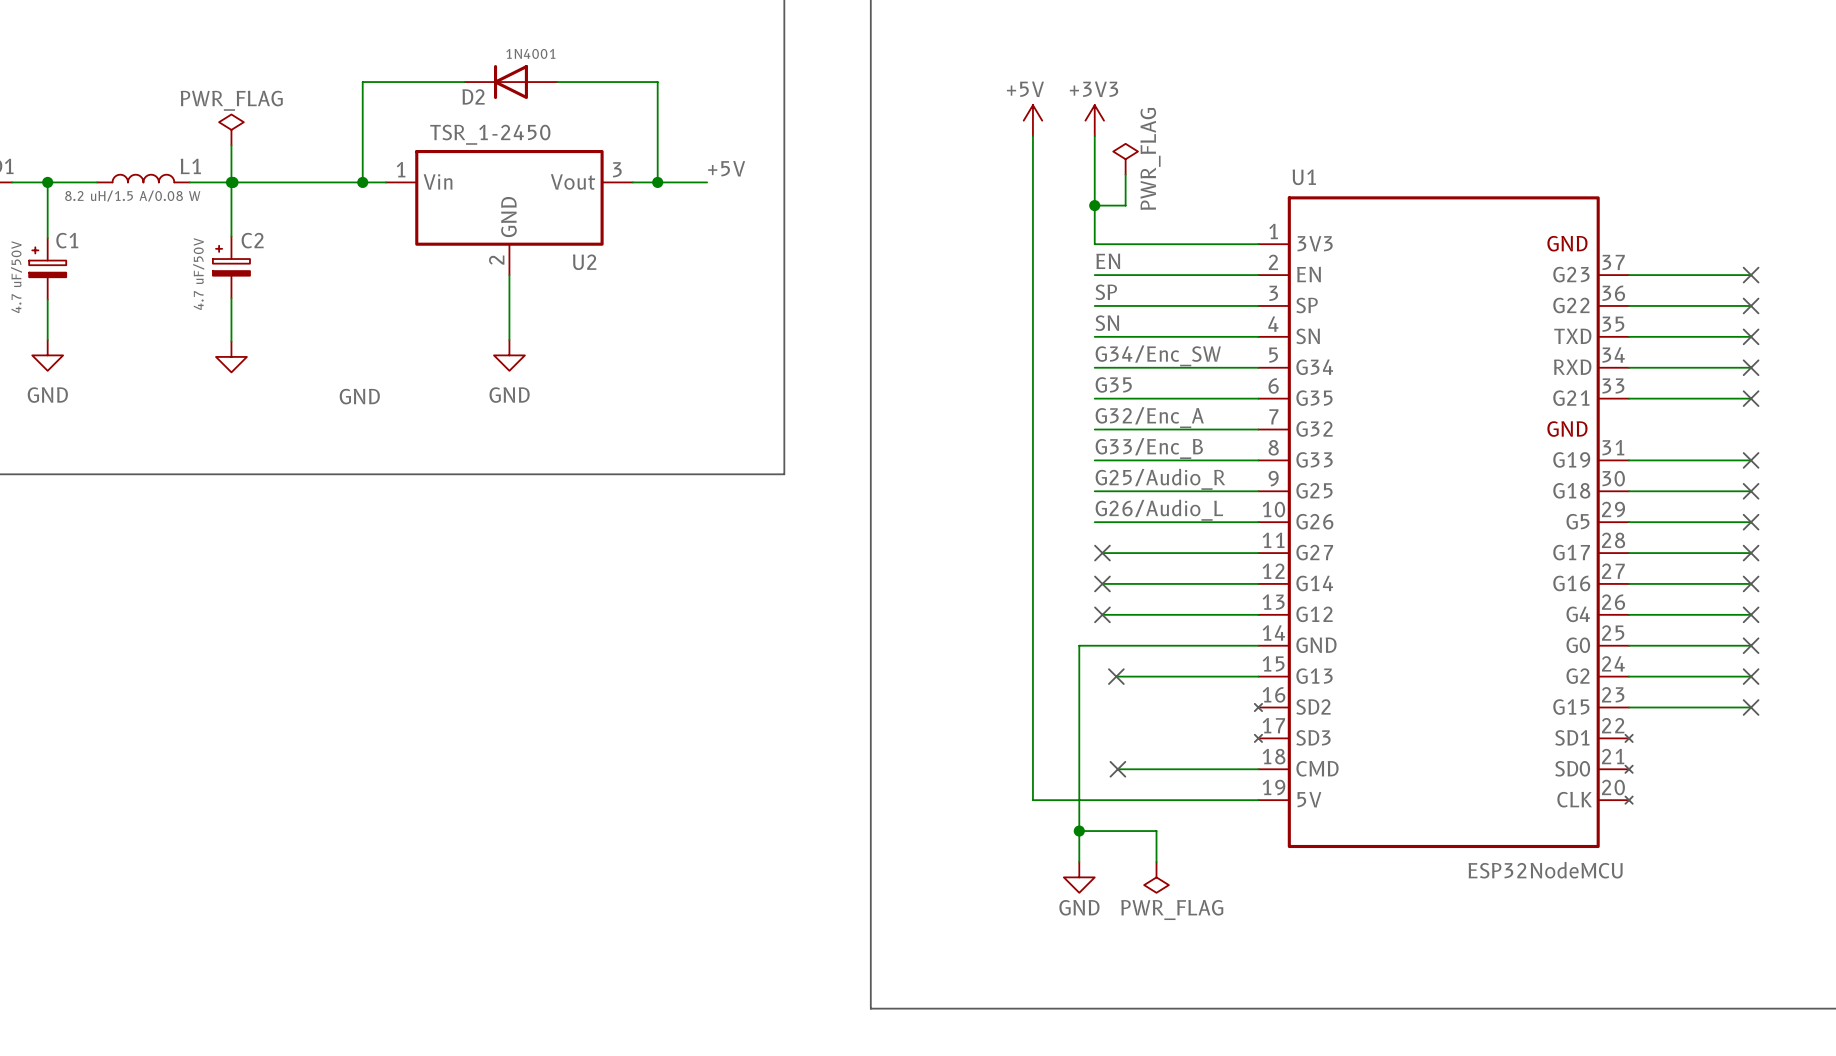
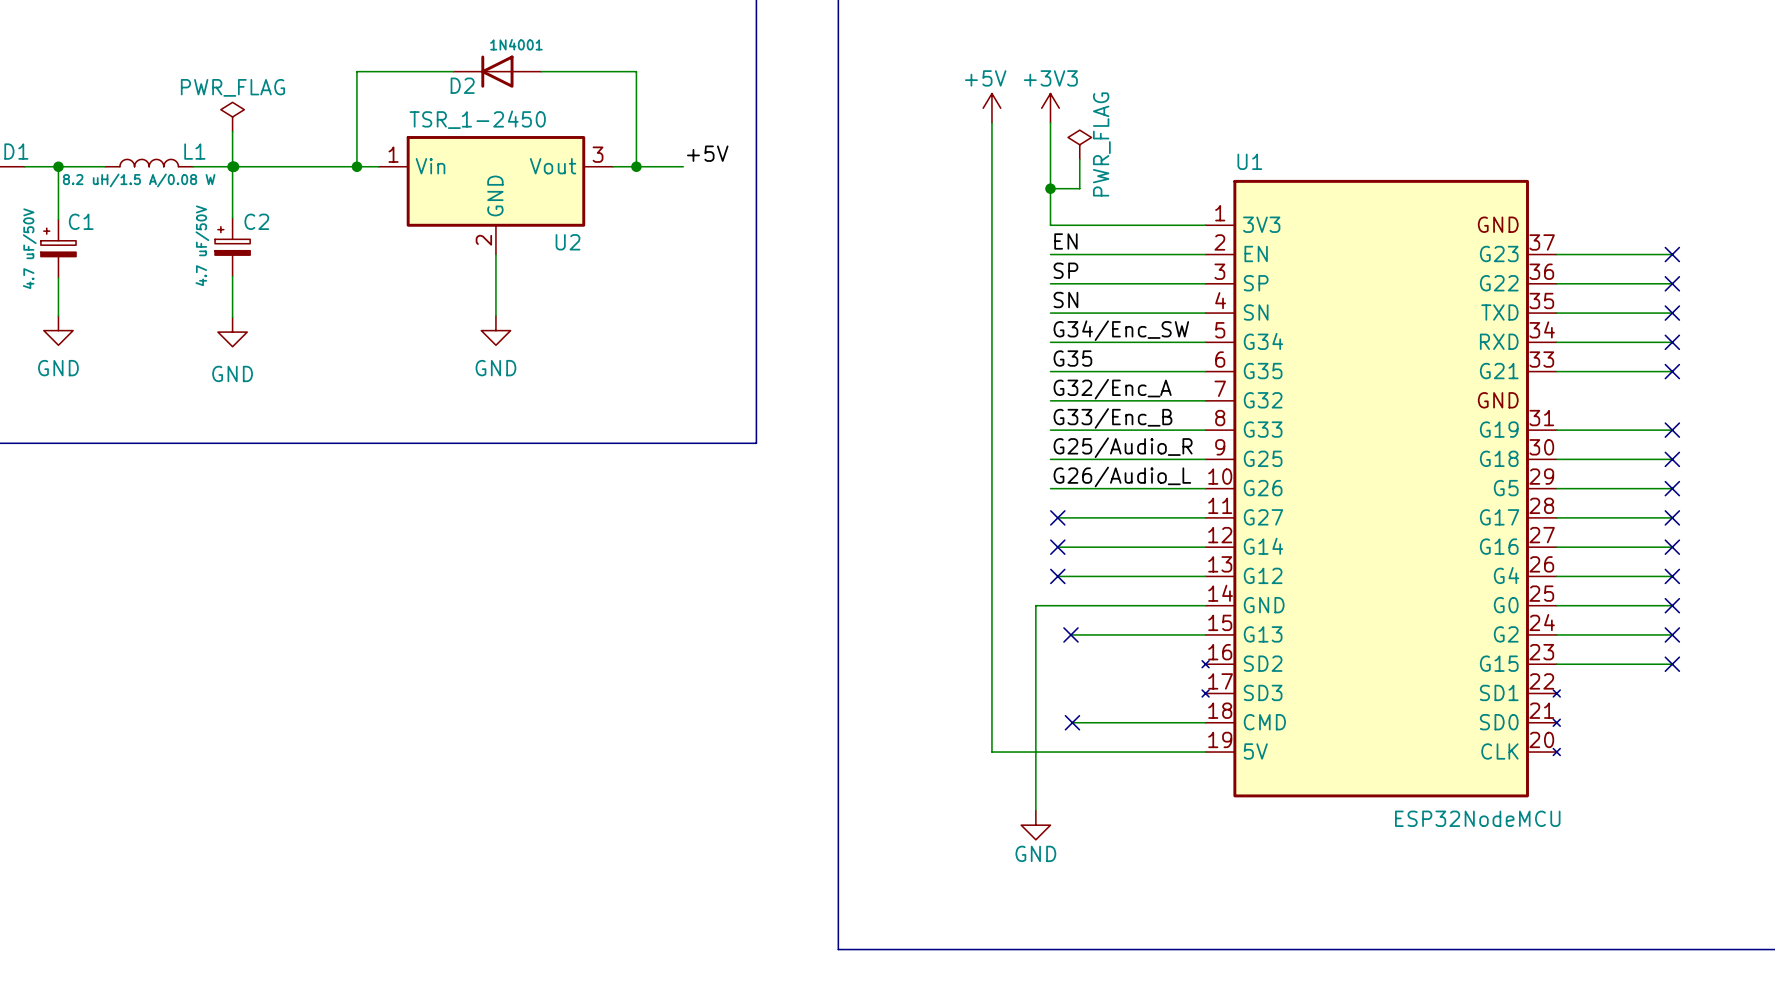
power symbol text position: GND (359, 396) -> GND (232, 373)
wire: (1079, 831) (1156, 831) (1156, 861) -> none
junction: (1079, 831) -> none
power symbol: PWR_FLAG (1156, 877) -> none

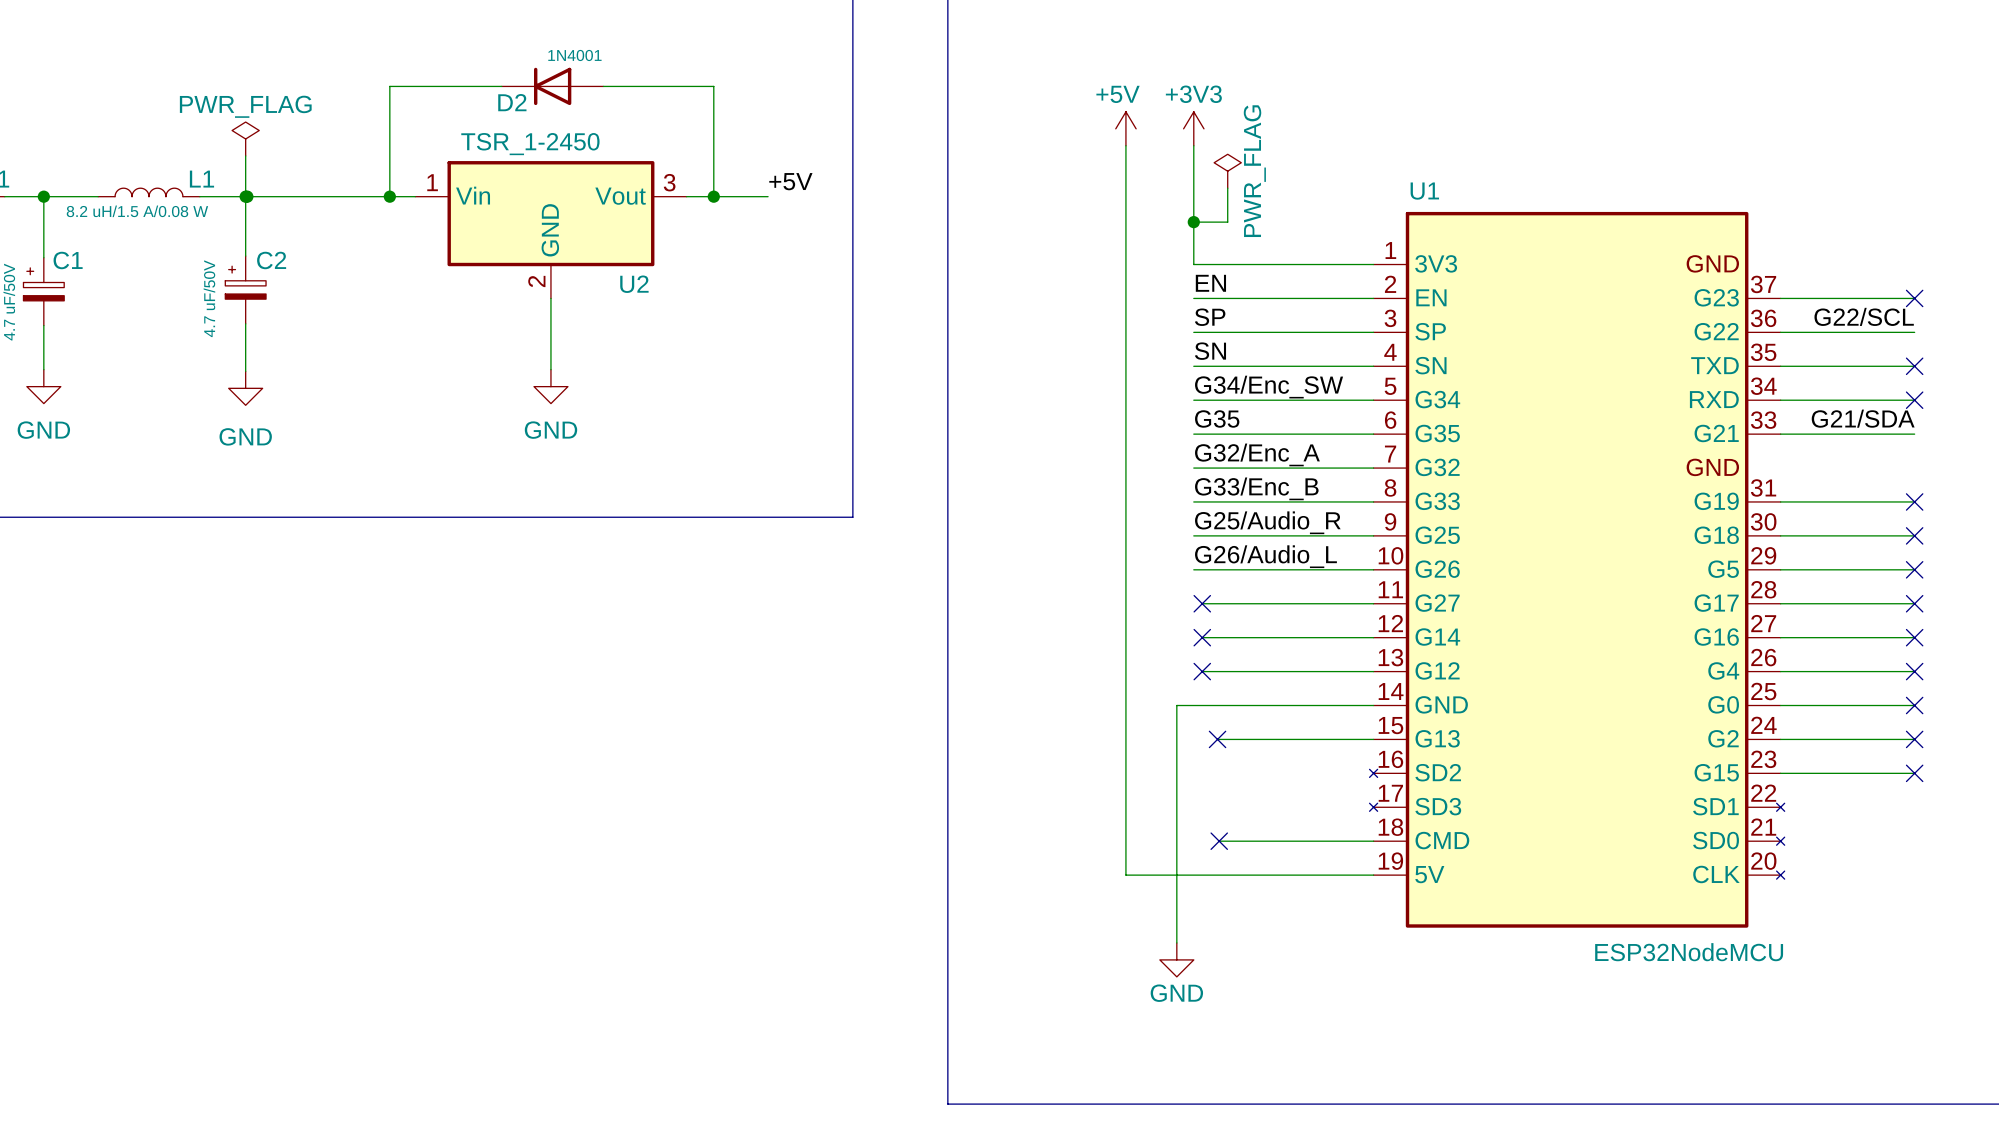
label: none -> G22/SCL (1864, 316)
no-connect mark: (1672, 283) -> none
label: none -> G21/SDA (1863, 418)
no-connect mark: (1672, 371) -> none

